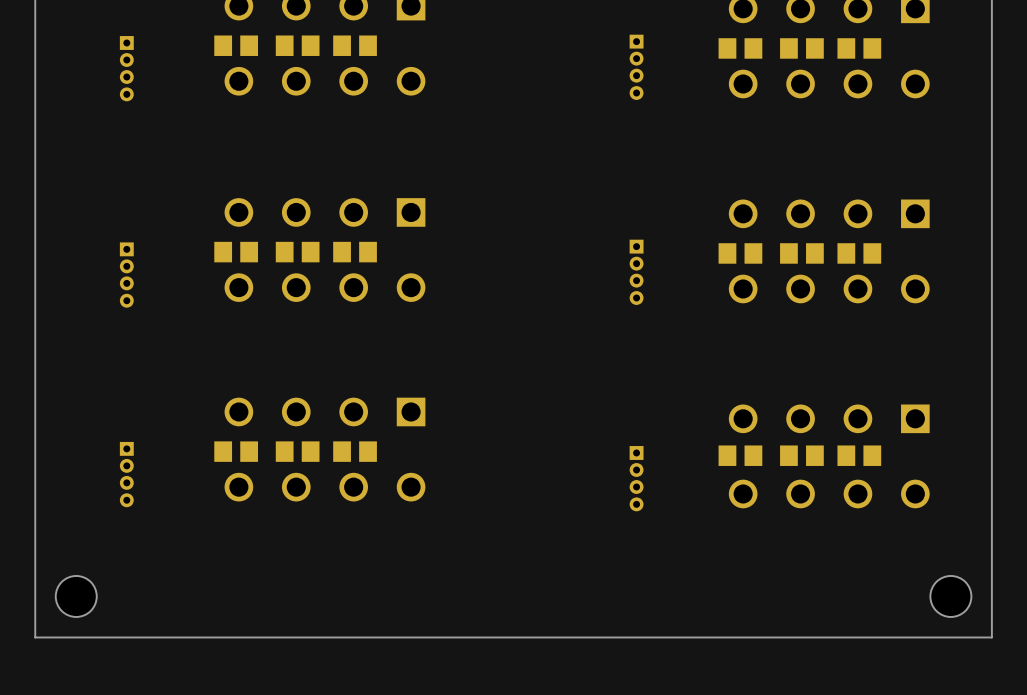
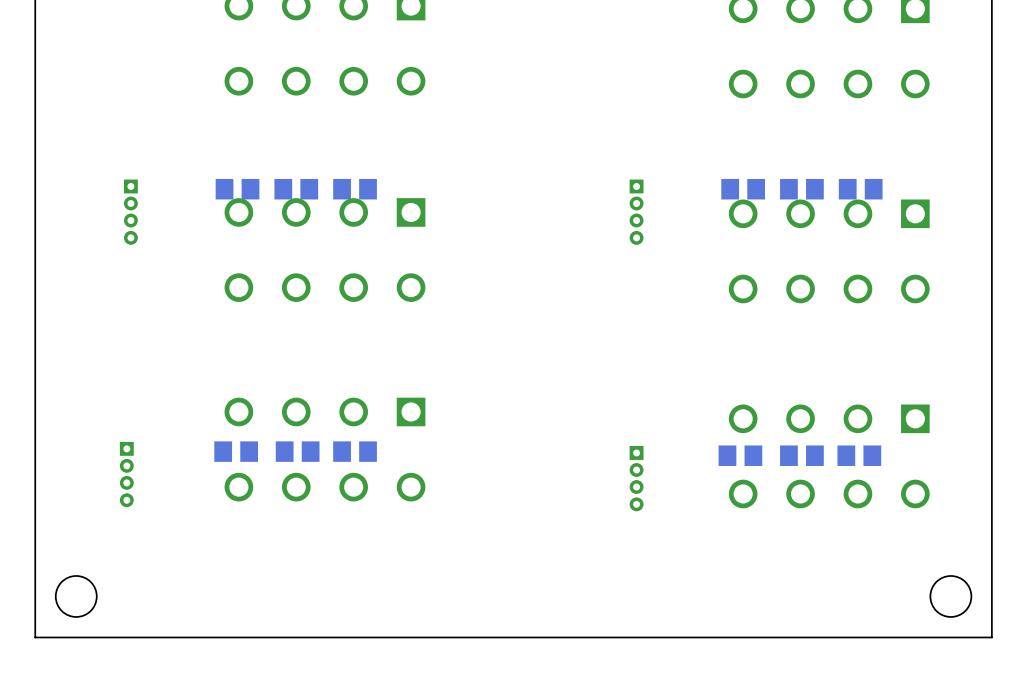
part: (236, 45) -> none
part: (297, 45) -> none
part: (355, 45) -> none
part: (740, 48) -> none
part: (801, 48) -> none
part: (859, 48) -> none
part: (636, 67) -> none
part: (126, 68) -> none
part: none -> (237, 189)
part: none -> (296, 189)
part: none -> (355, 189)
part: none -> (743, 189)
part: none -> (801, 189)
part: none -> (860, 189)
part: (236, 252) -> none
part: (297, 252) -> none
part: (355, 252) -> none
part: (740, 253) -> none
part: (801, 253) -> none
part: (859, 253) -> none
part position: (636, 272) -> (636, 212)
part position: (126, 275) -> (130, 212)

